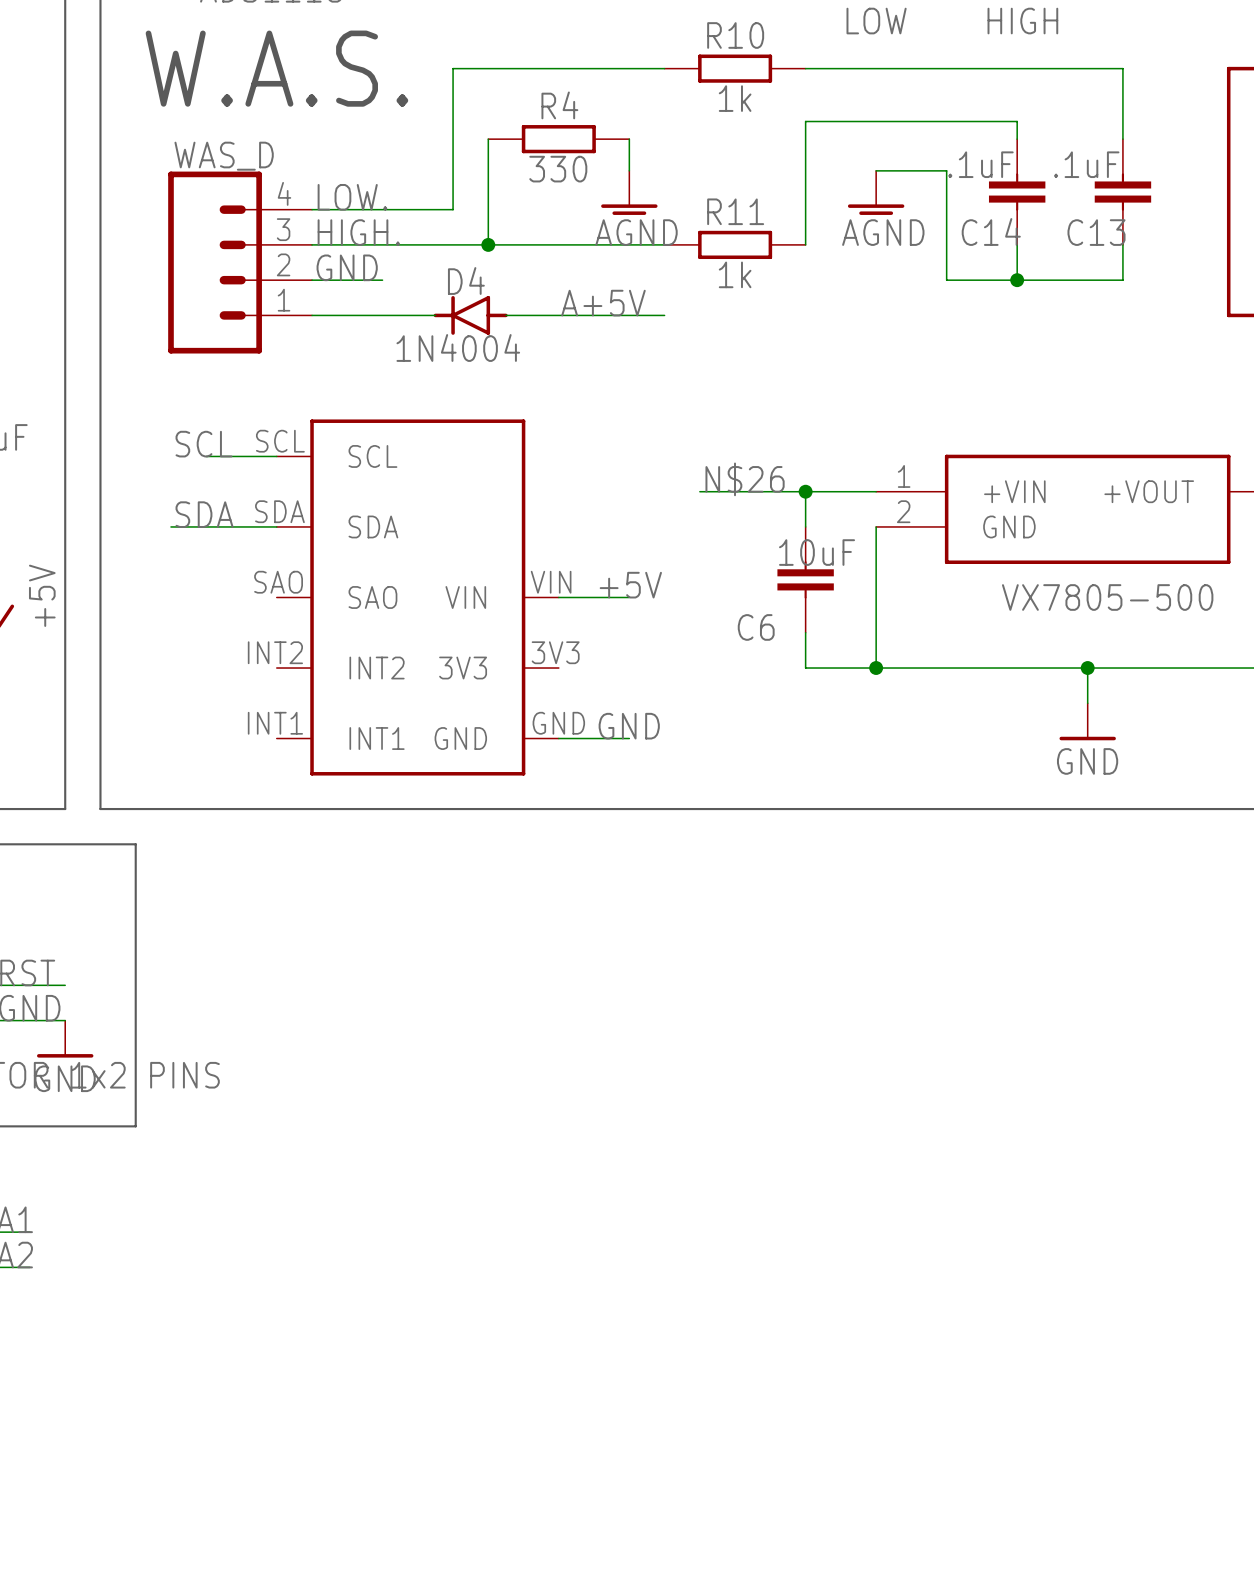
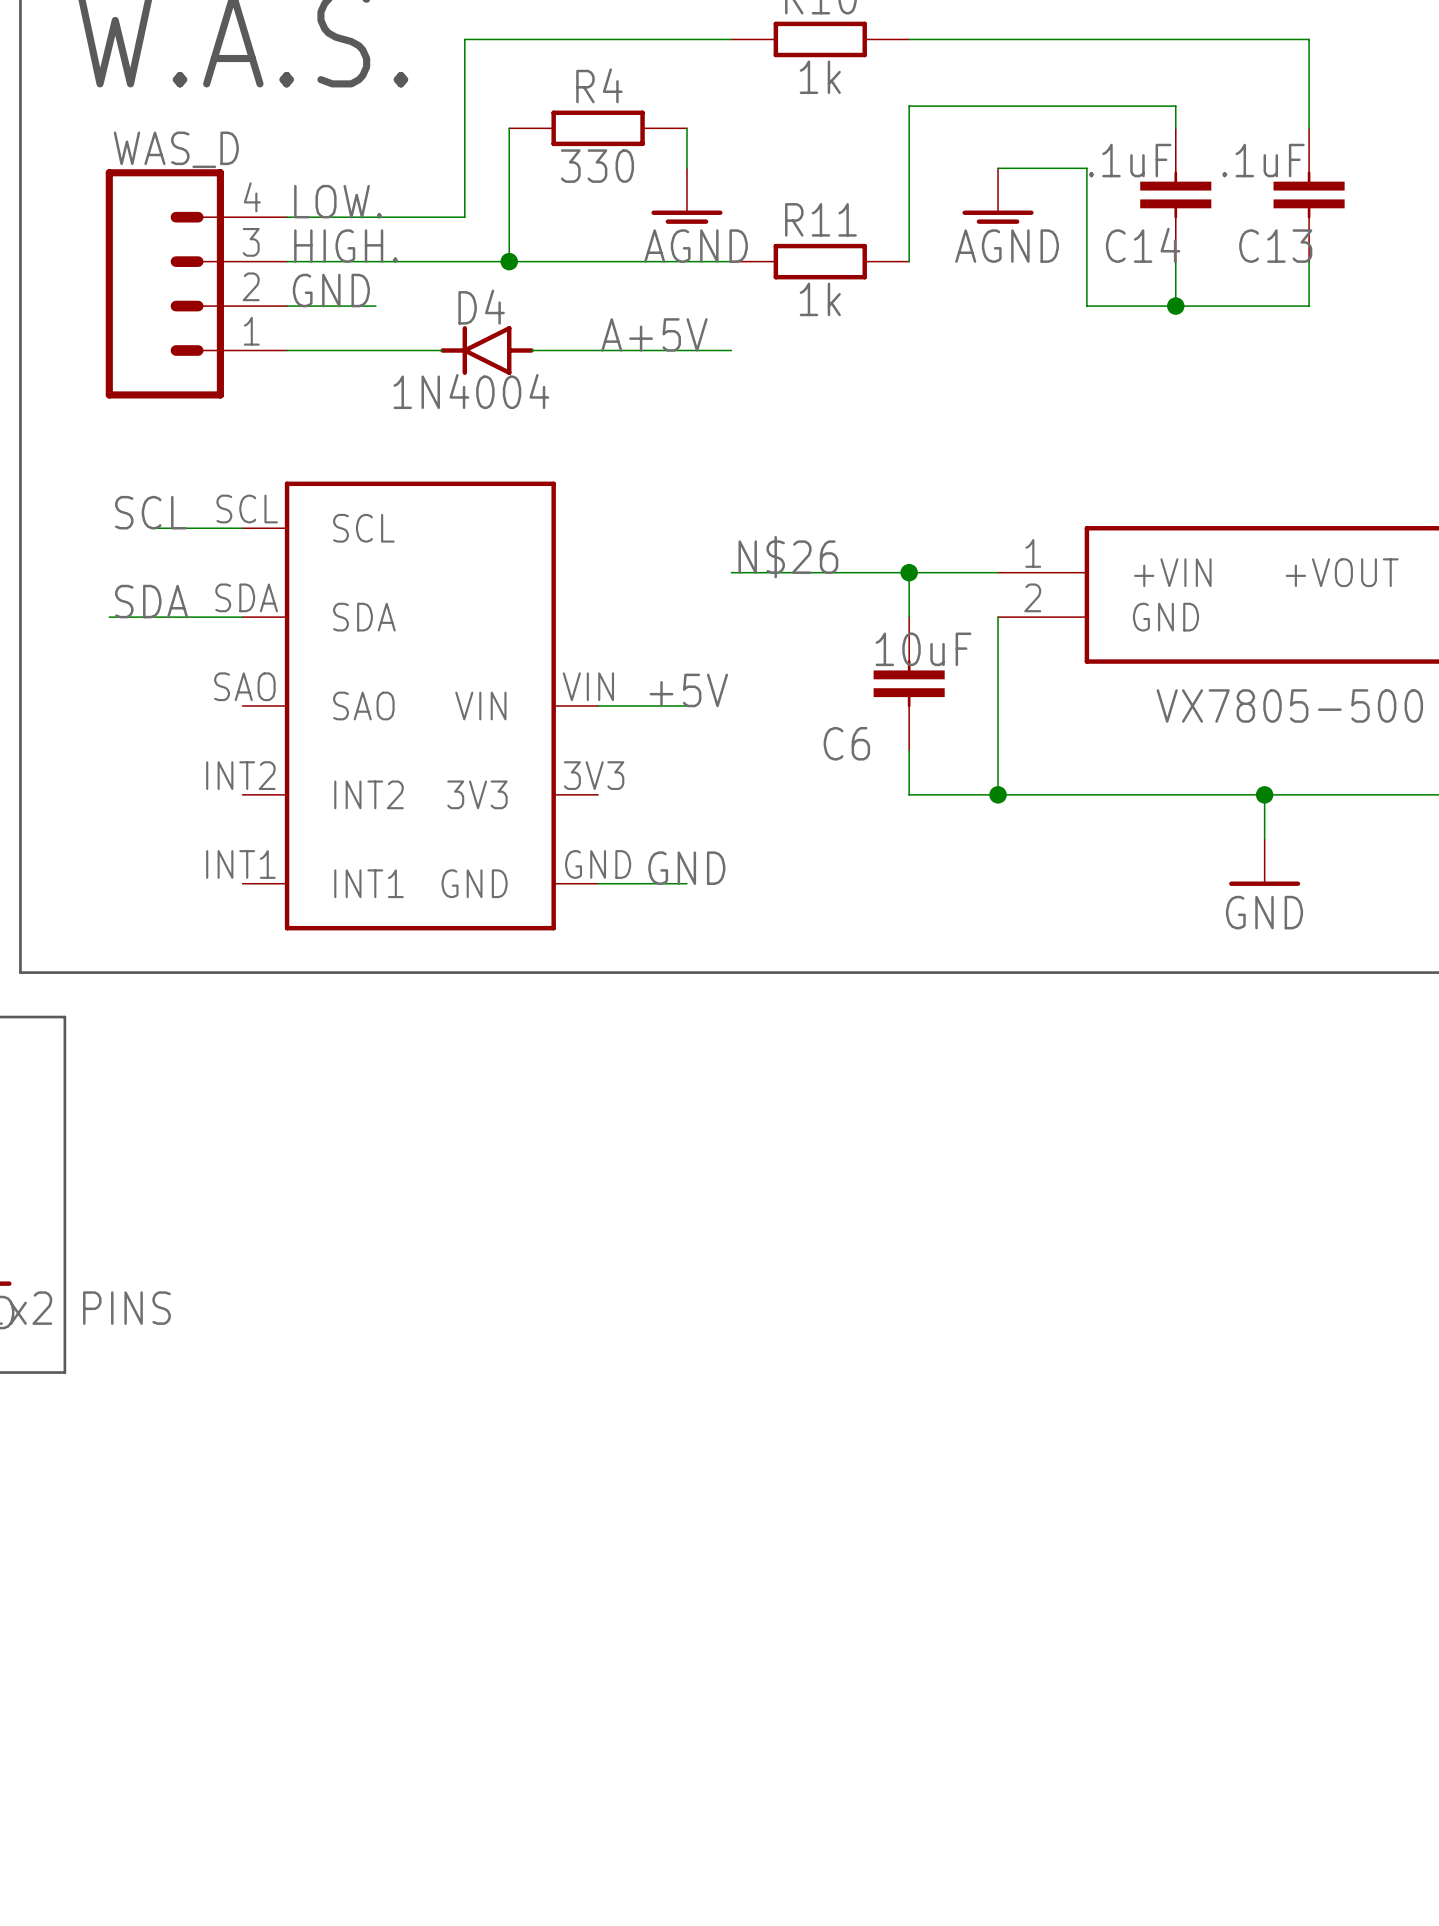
label position: N$26 (745, 479) -> N$26 (788, 557)
wire: none -> (731, 572) (775, 572)

